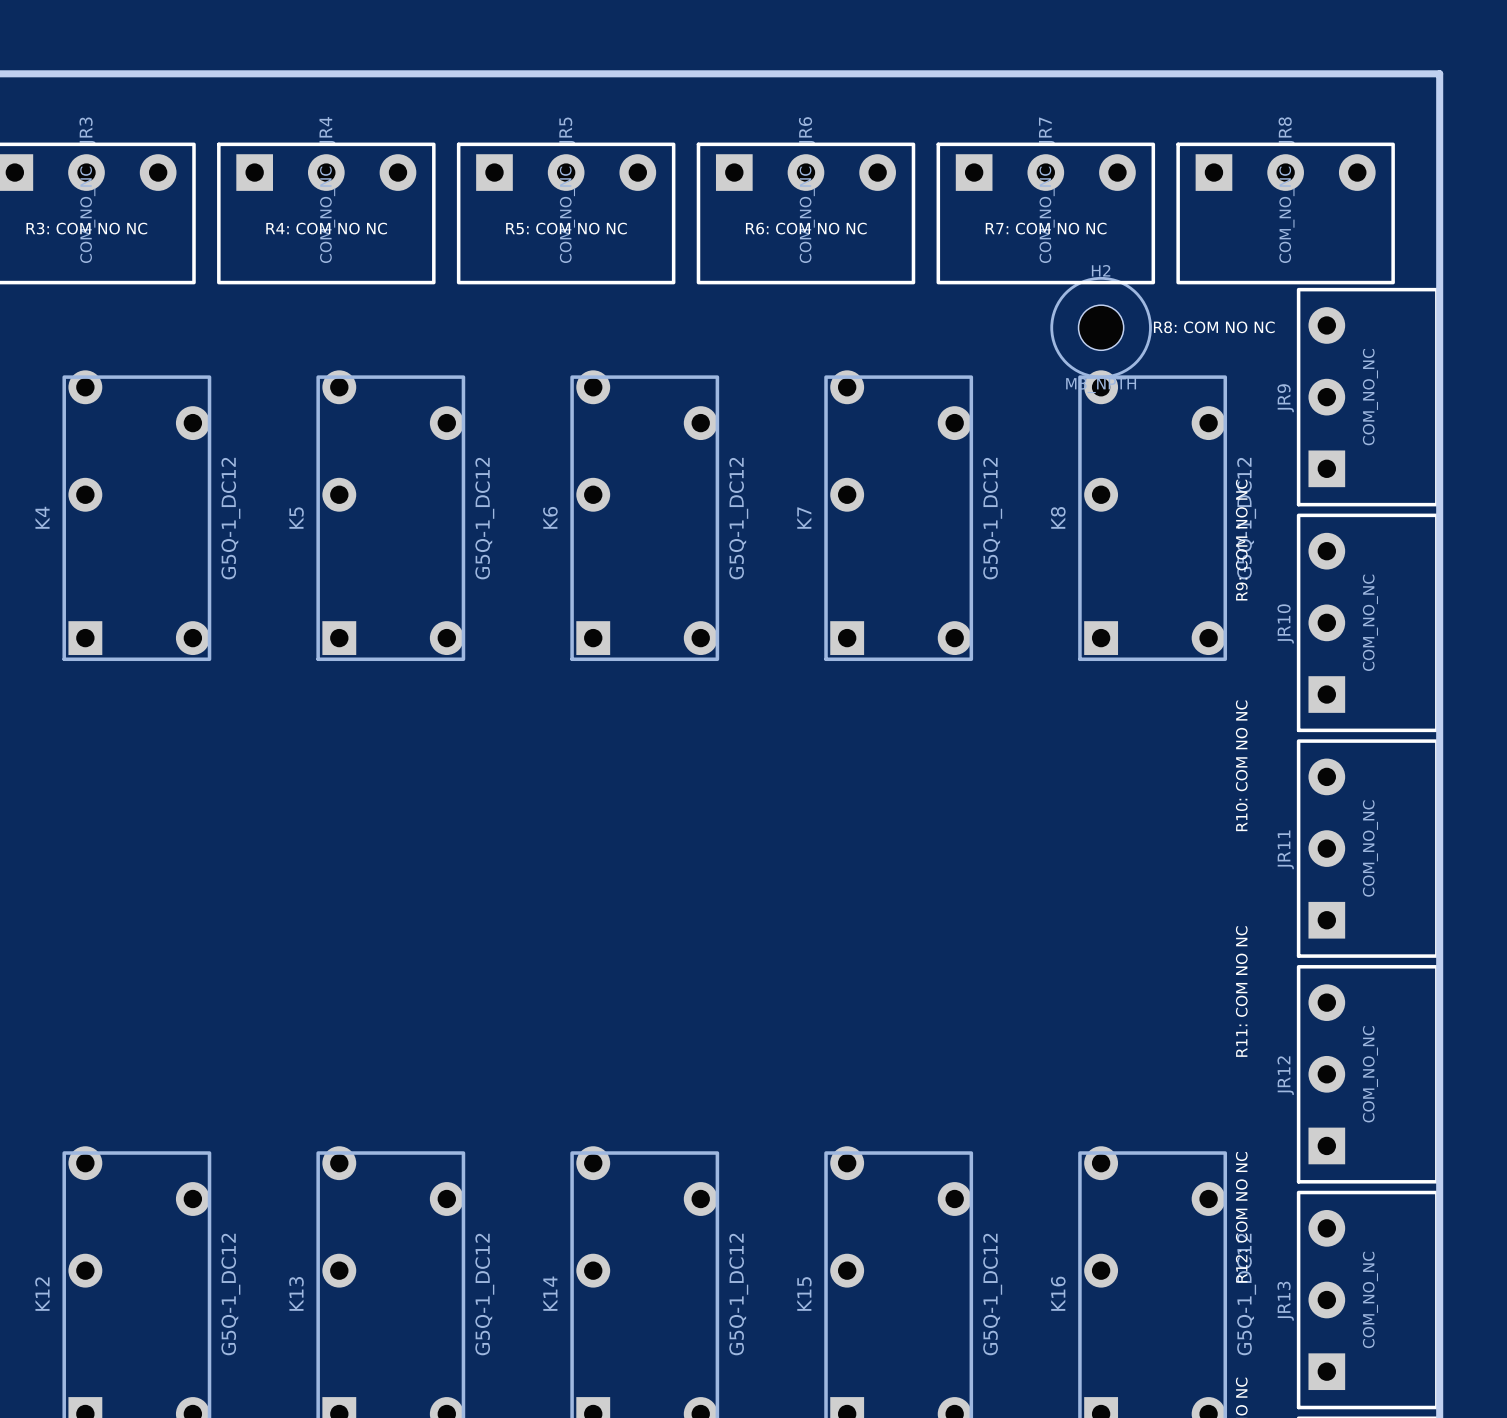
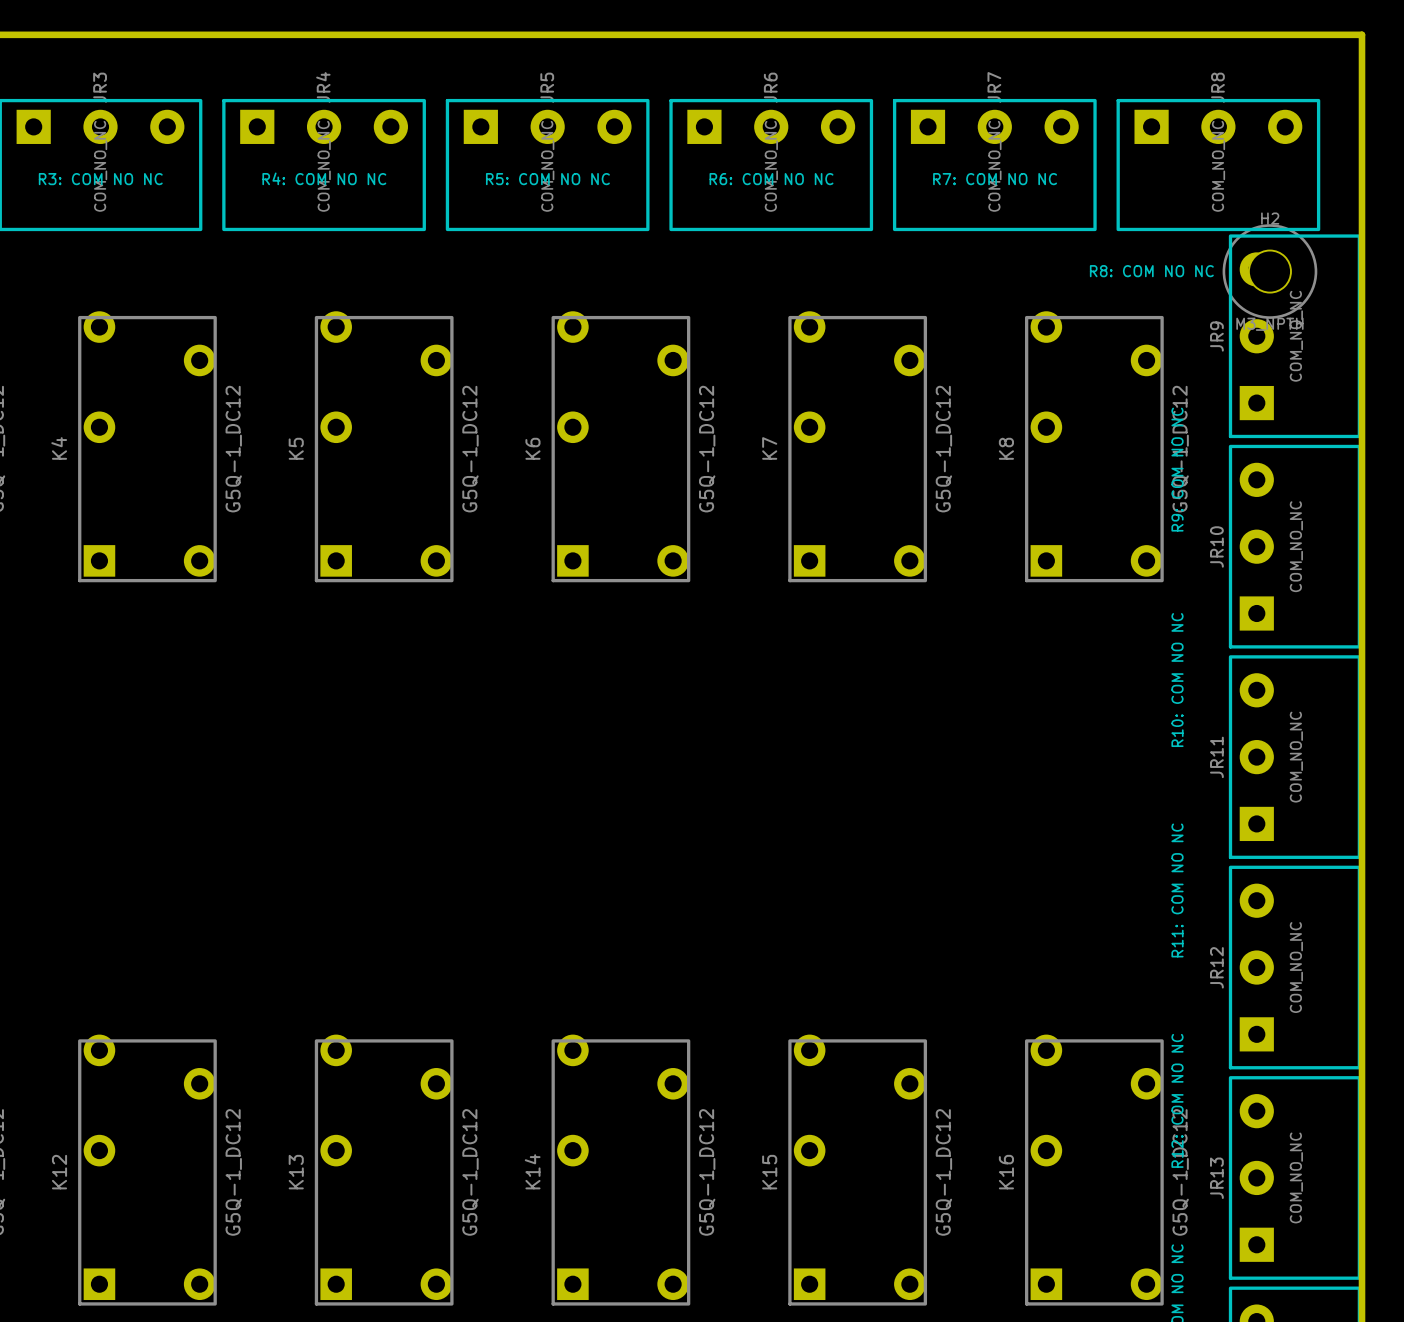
H2 position: (1101, 327) -> (1269, 271)

